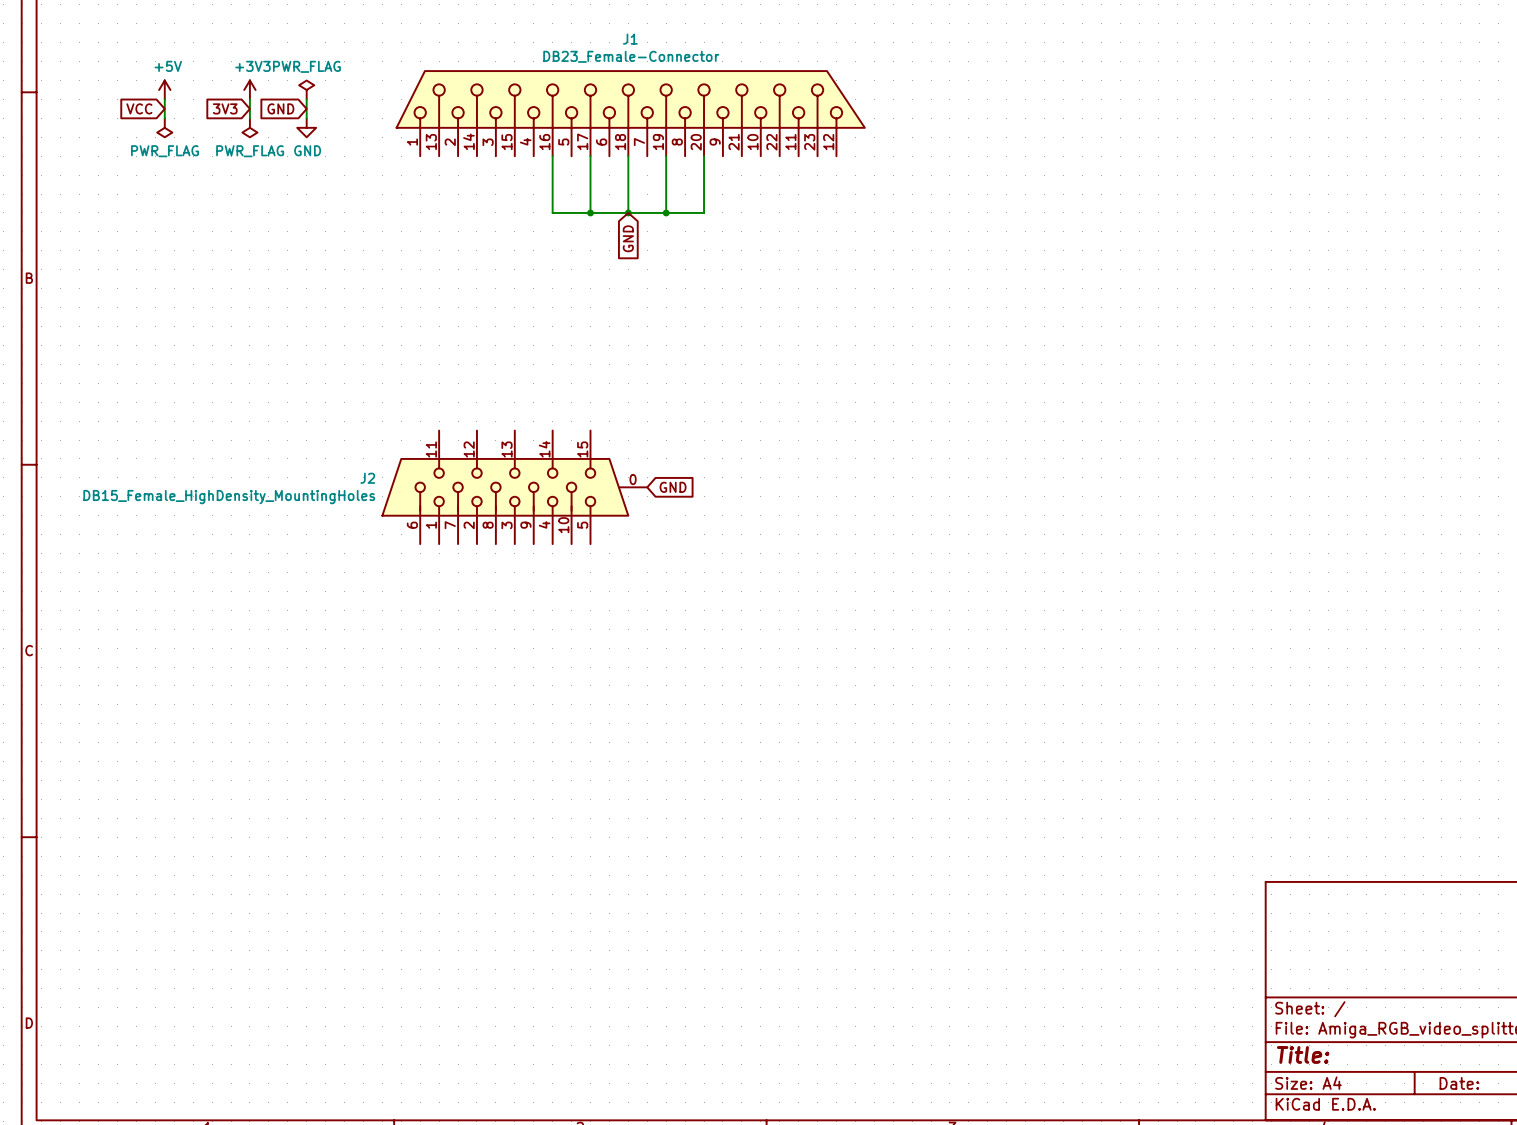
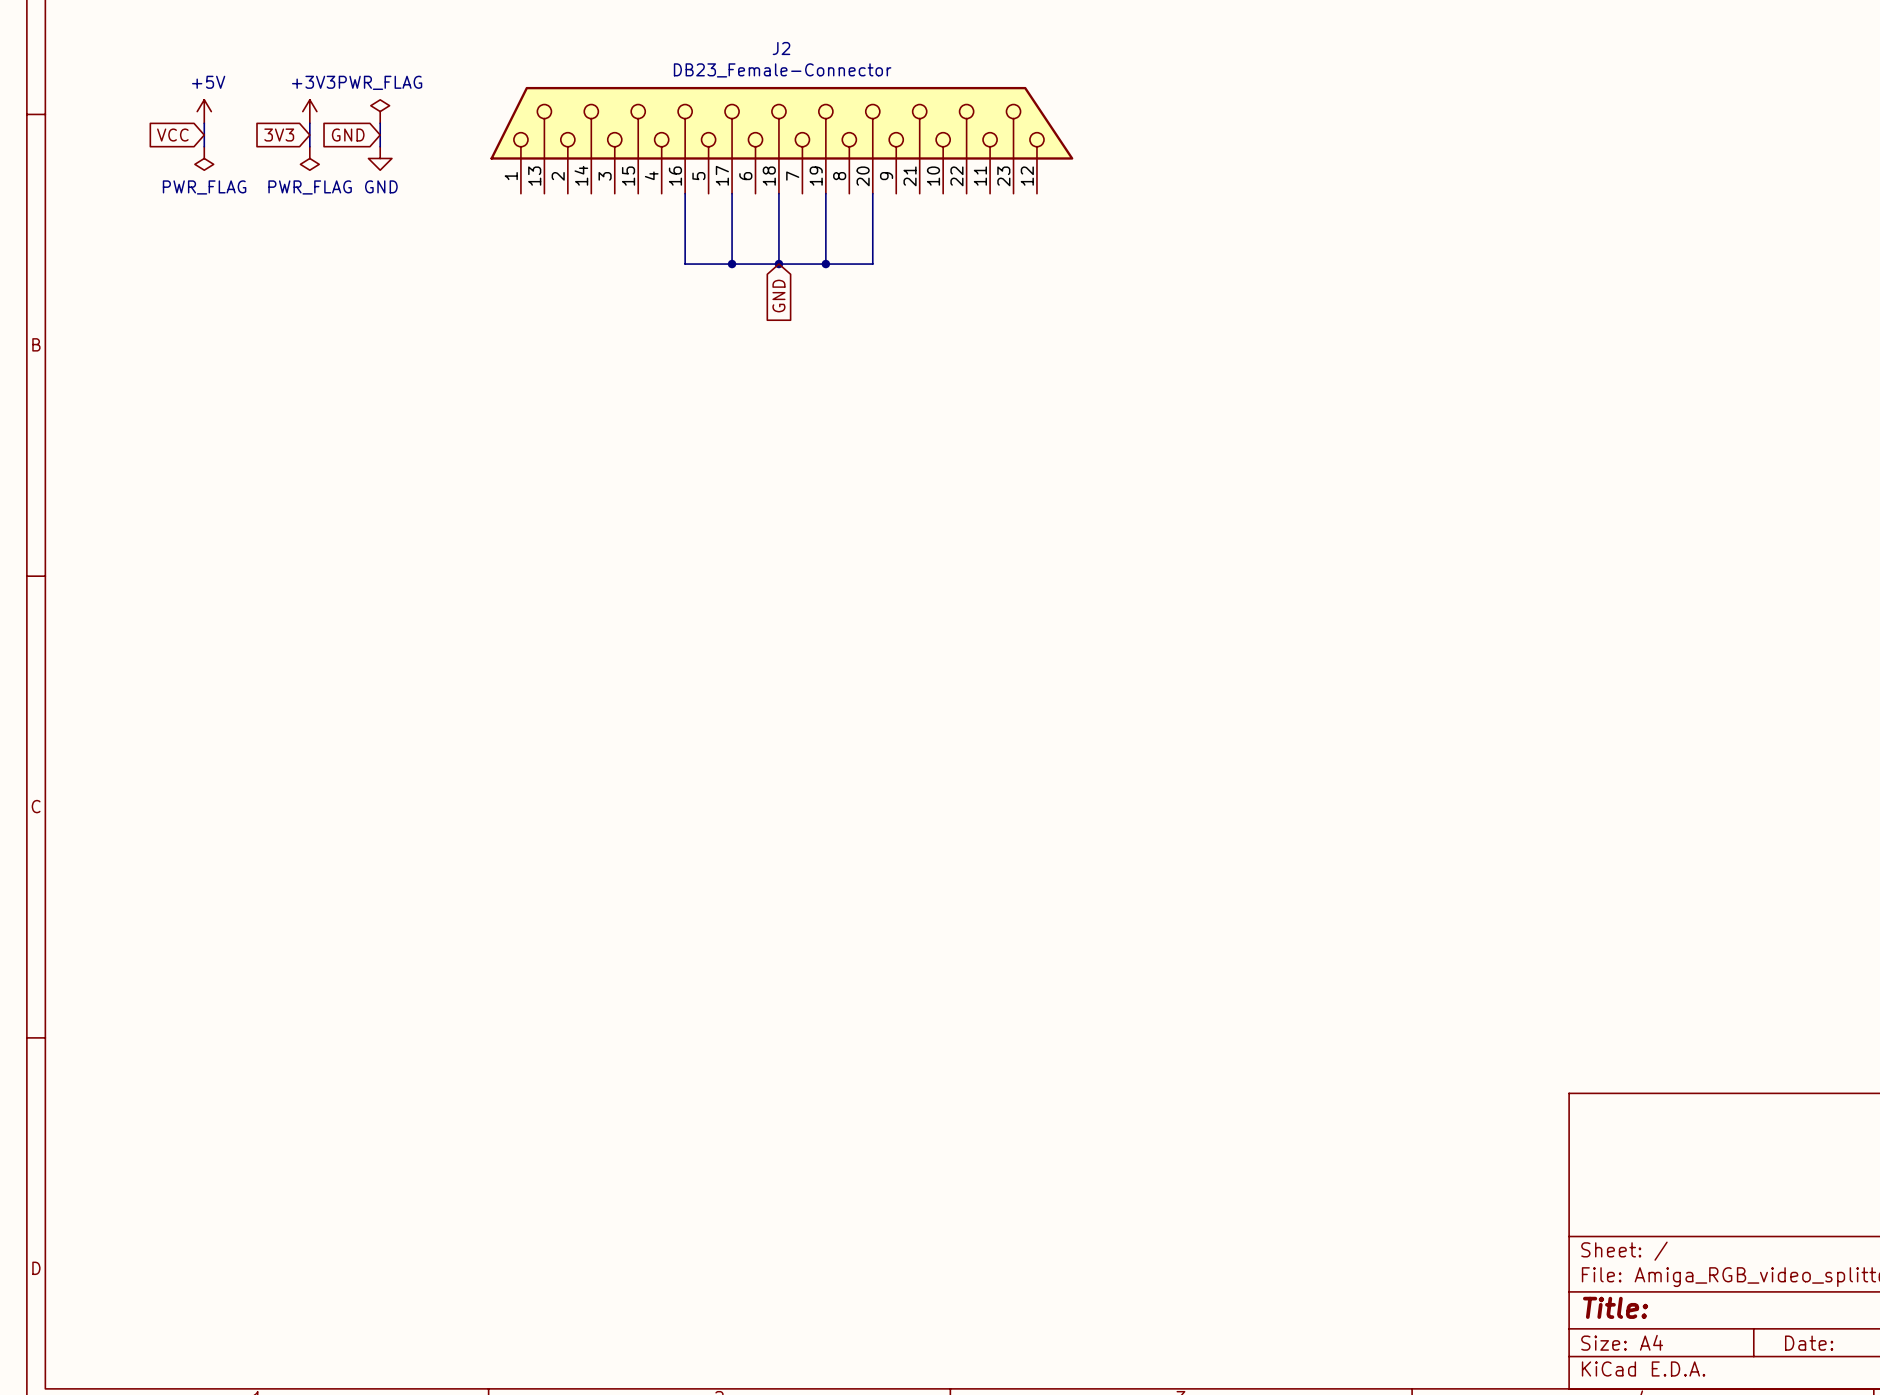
J1 name: J1 (630, 39) -> J2 (781, 48)
J2: DB15_Female_HighDensity_MountingHoles (514, 487) -> none
global label: GND (673, 487) -> none

